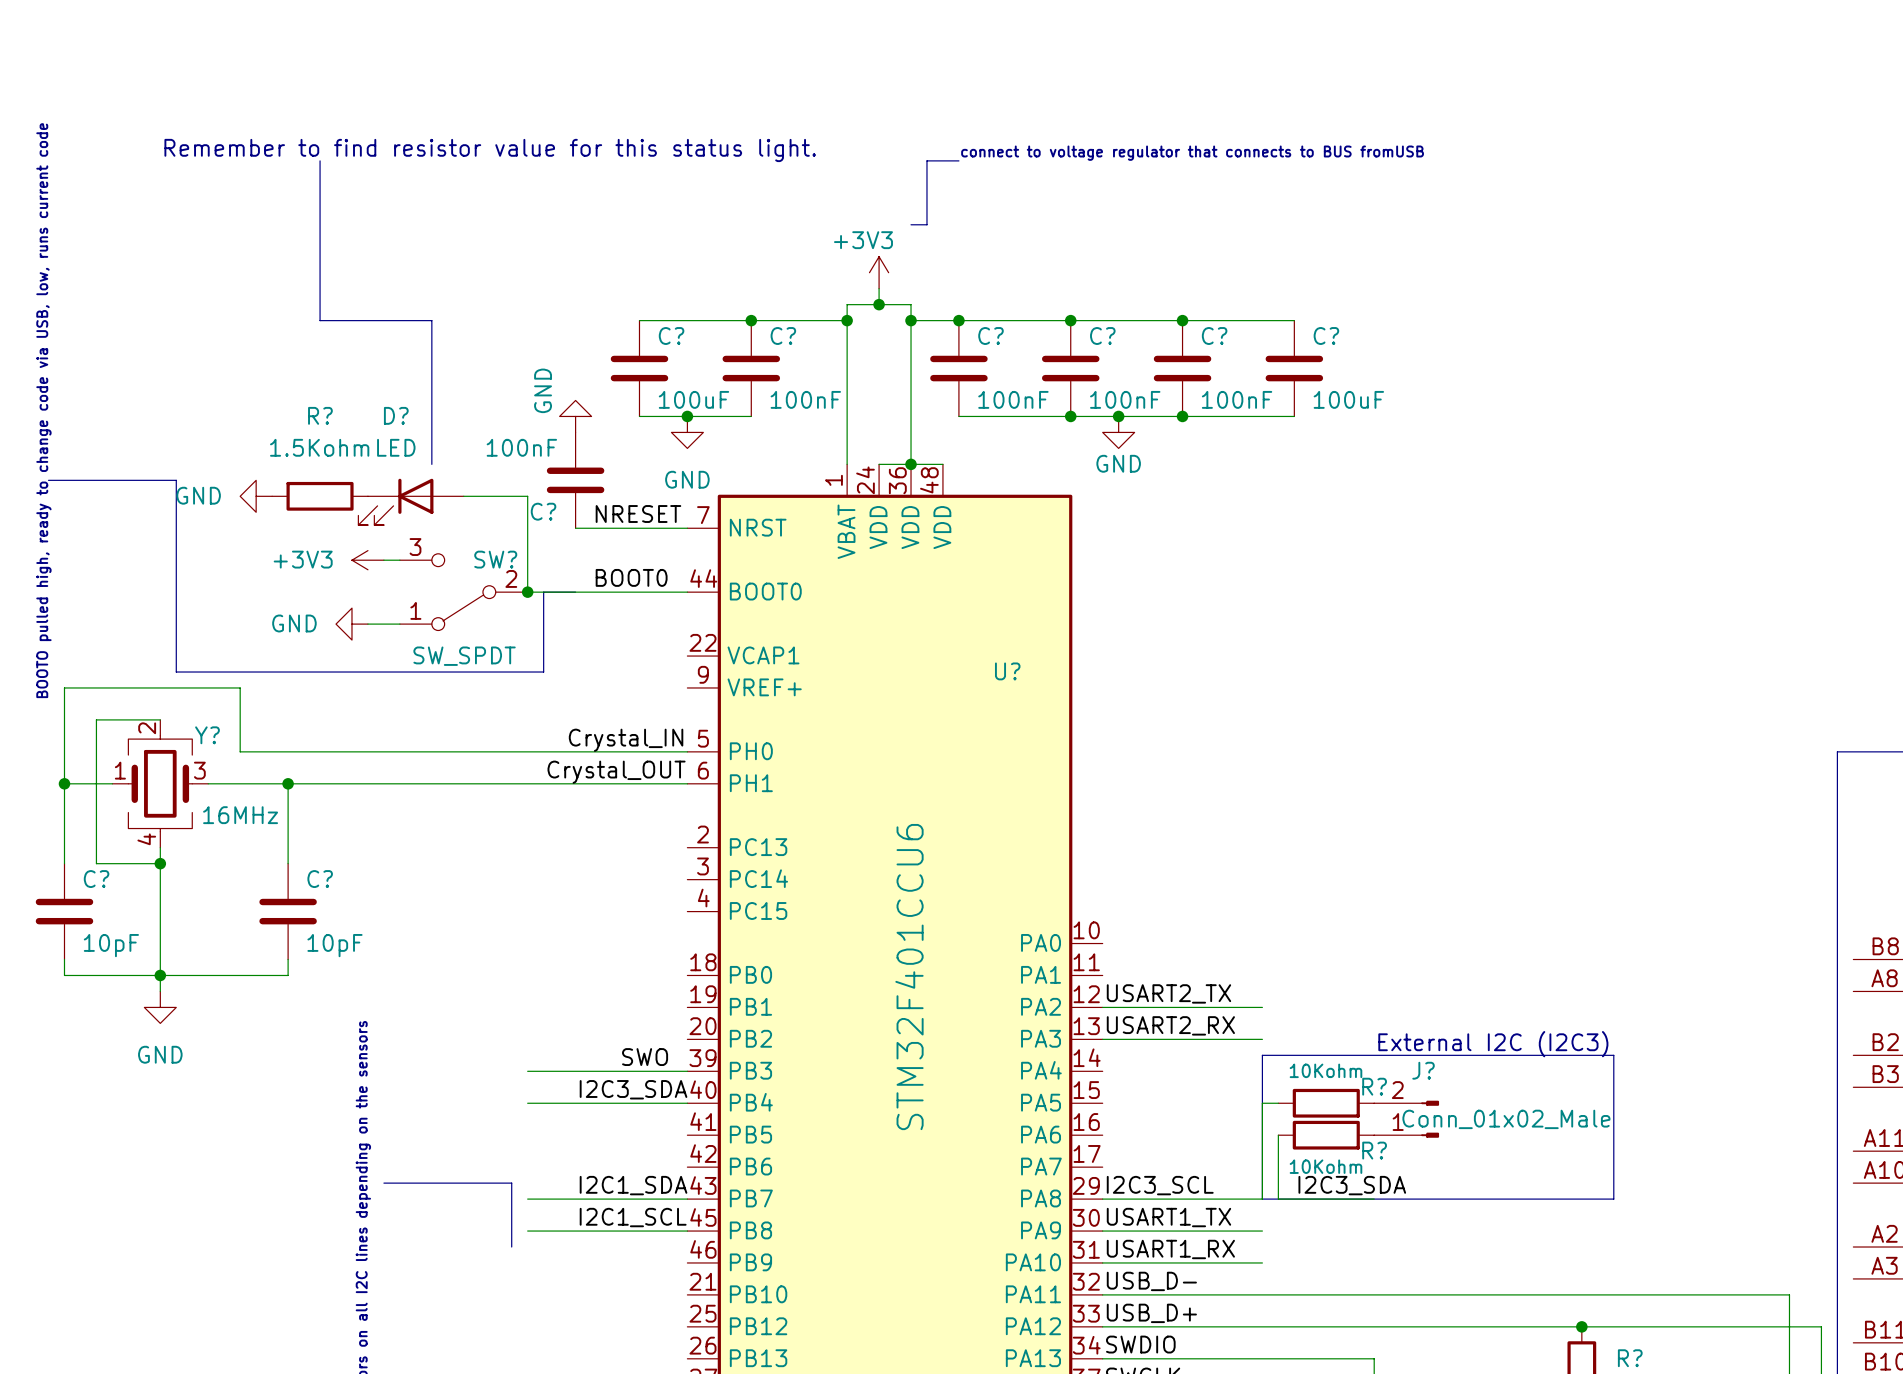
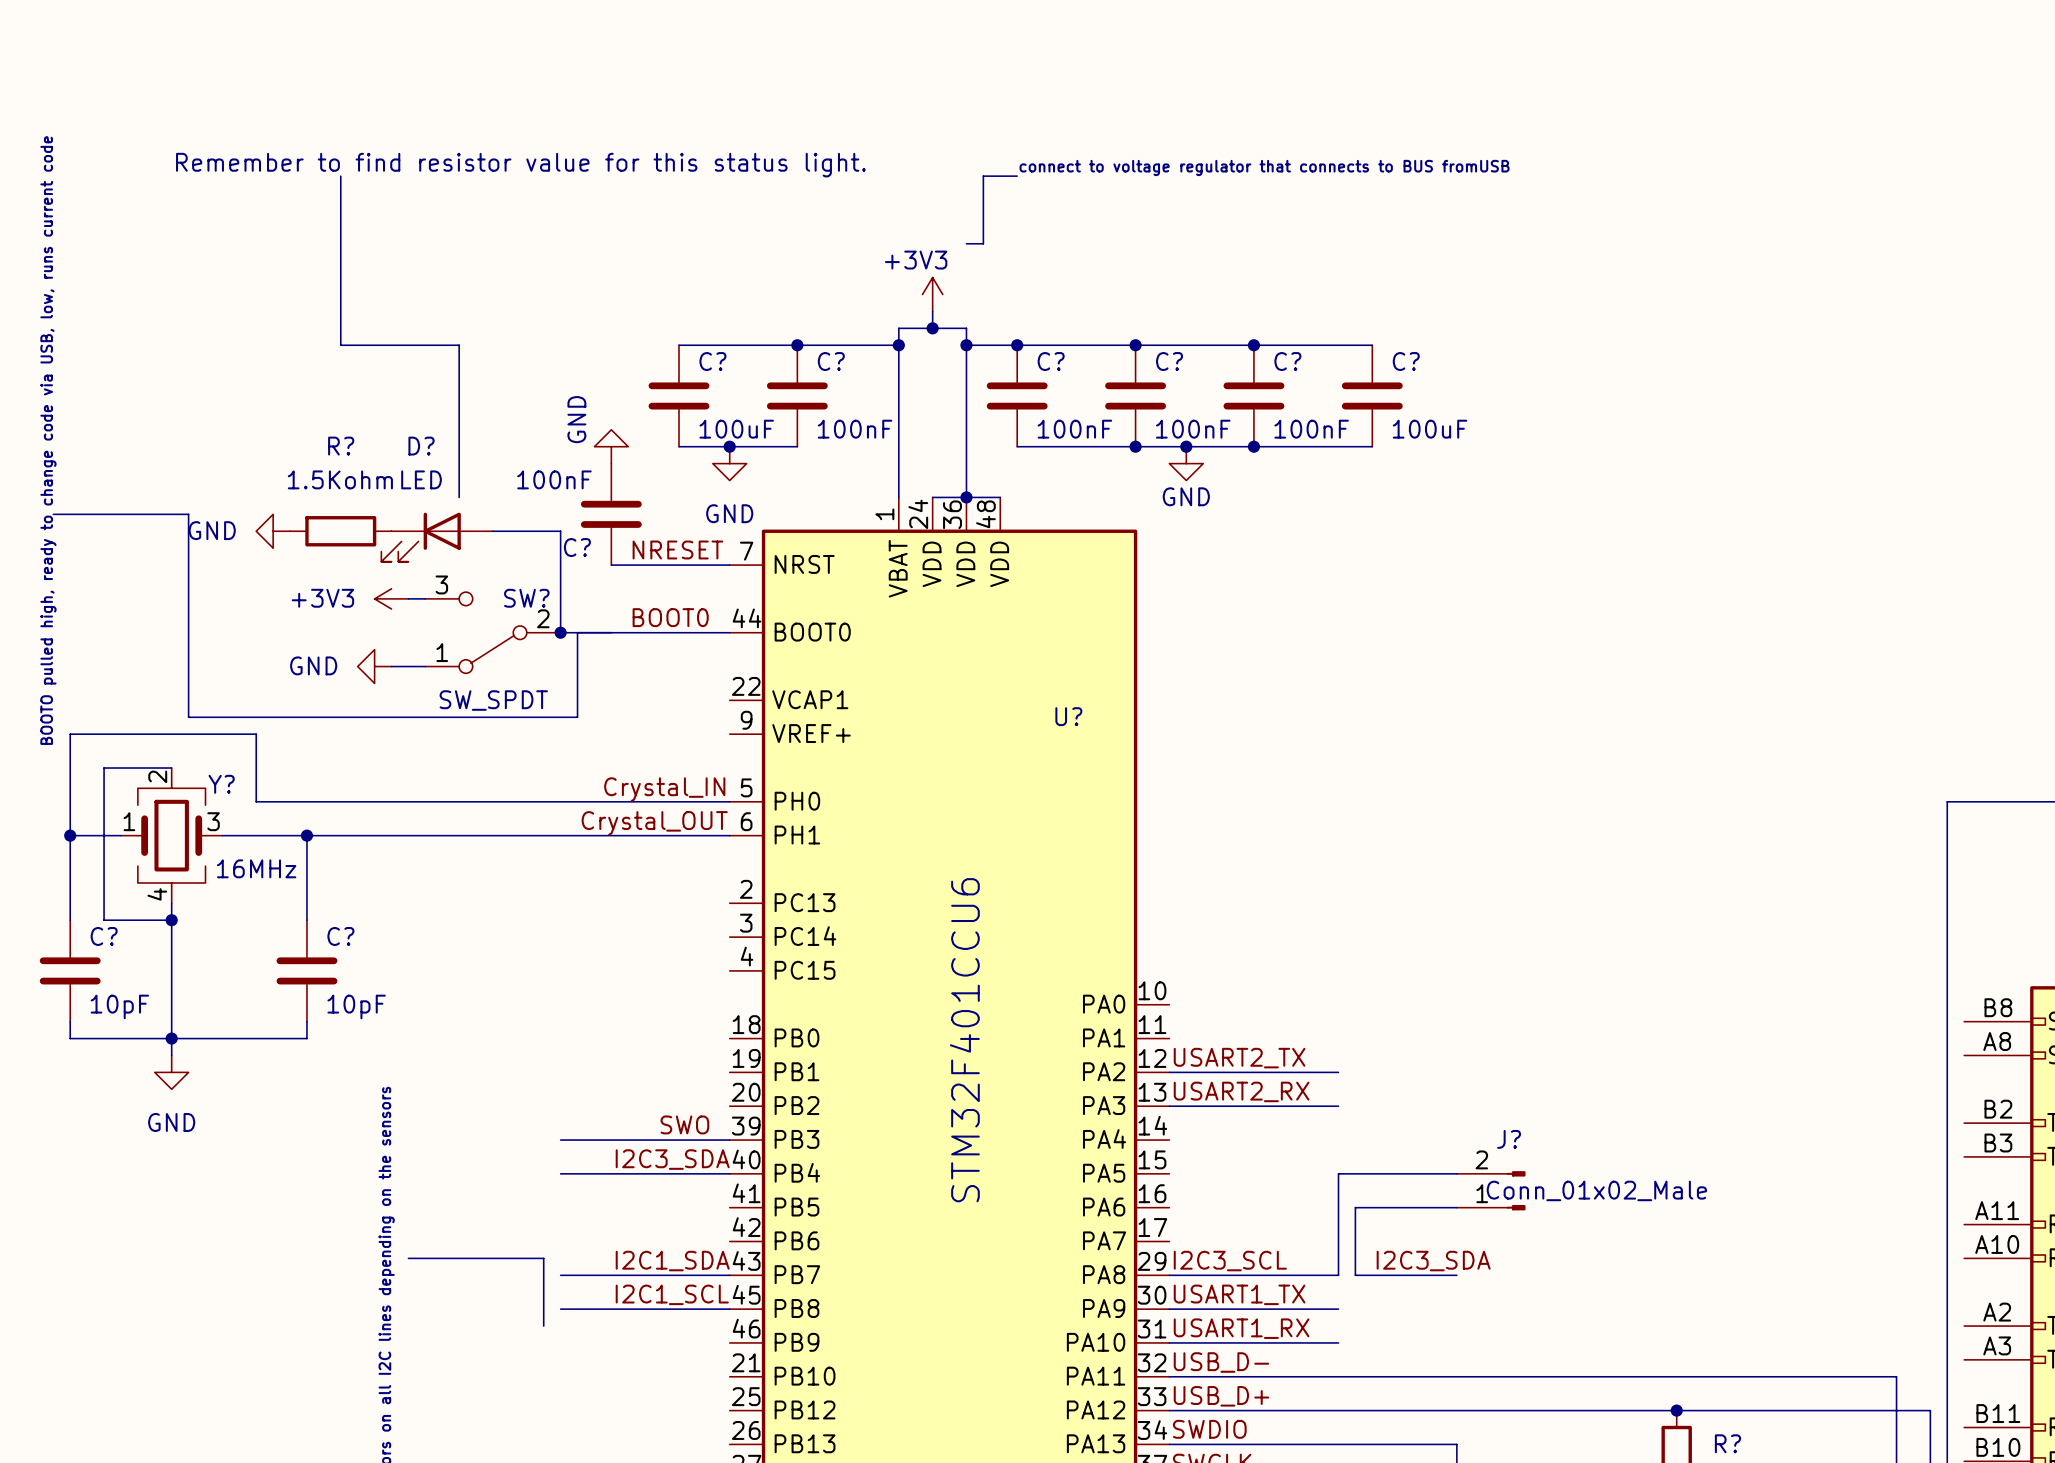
text: External I2C (I2C3) (1493, 1044) -> none
line: (1262, 1055) (1613, 1055) (1613, 1199) (1262, 1199) (1262, 1055) -> none
wire: none -> (1355, 1173) (1456, 1173)
R?: 10Kohm (1326, 1103) -> none
wire: none -> (1355, 1207) (1456, 1207)
R?: 10Kohm (1326, 1135) -> none

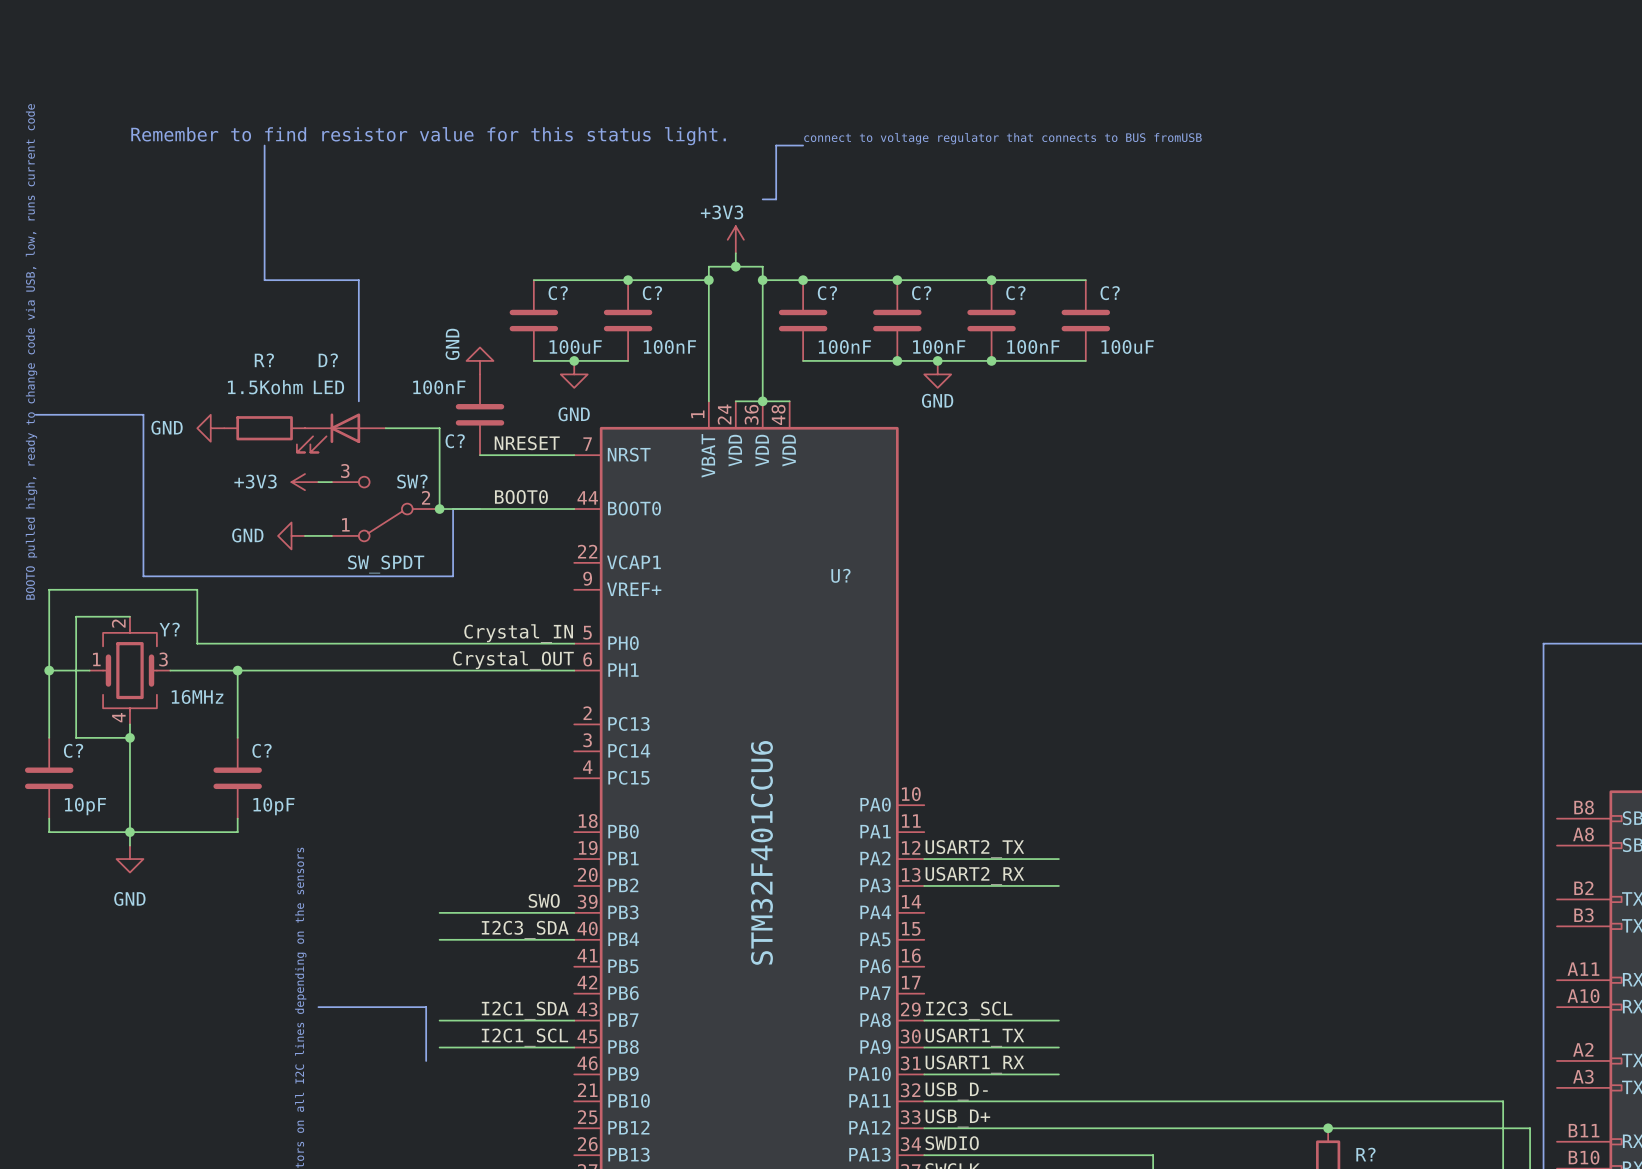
wire: (1456, 1173) (1338, 1173) (1338, 1275) -> none
J?: Conn_01x02_Male (1491, 1190) -> none
wire: (1456, 1207) (1355, 1207) (1355, 1275) (1456, 1275) -> none
label: I2C3_SDA (1433, 1261) -> none

